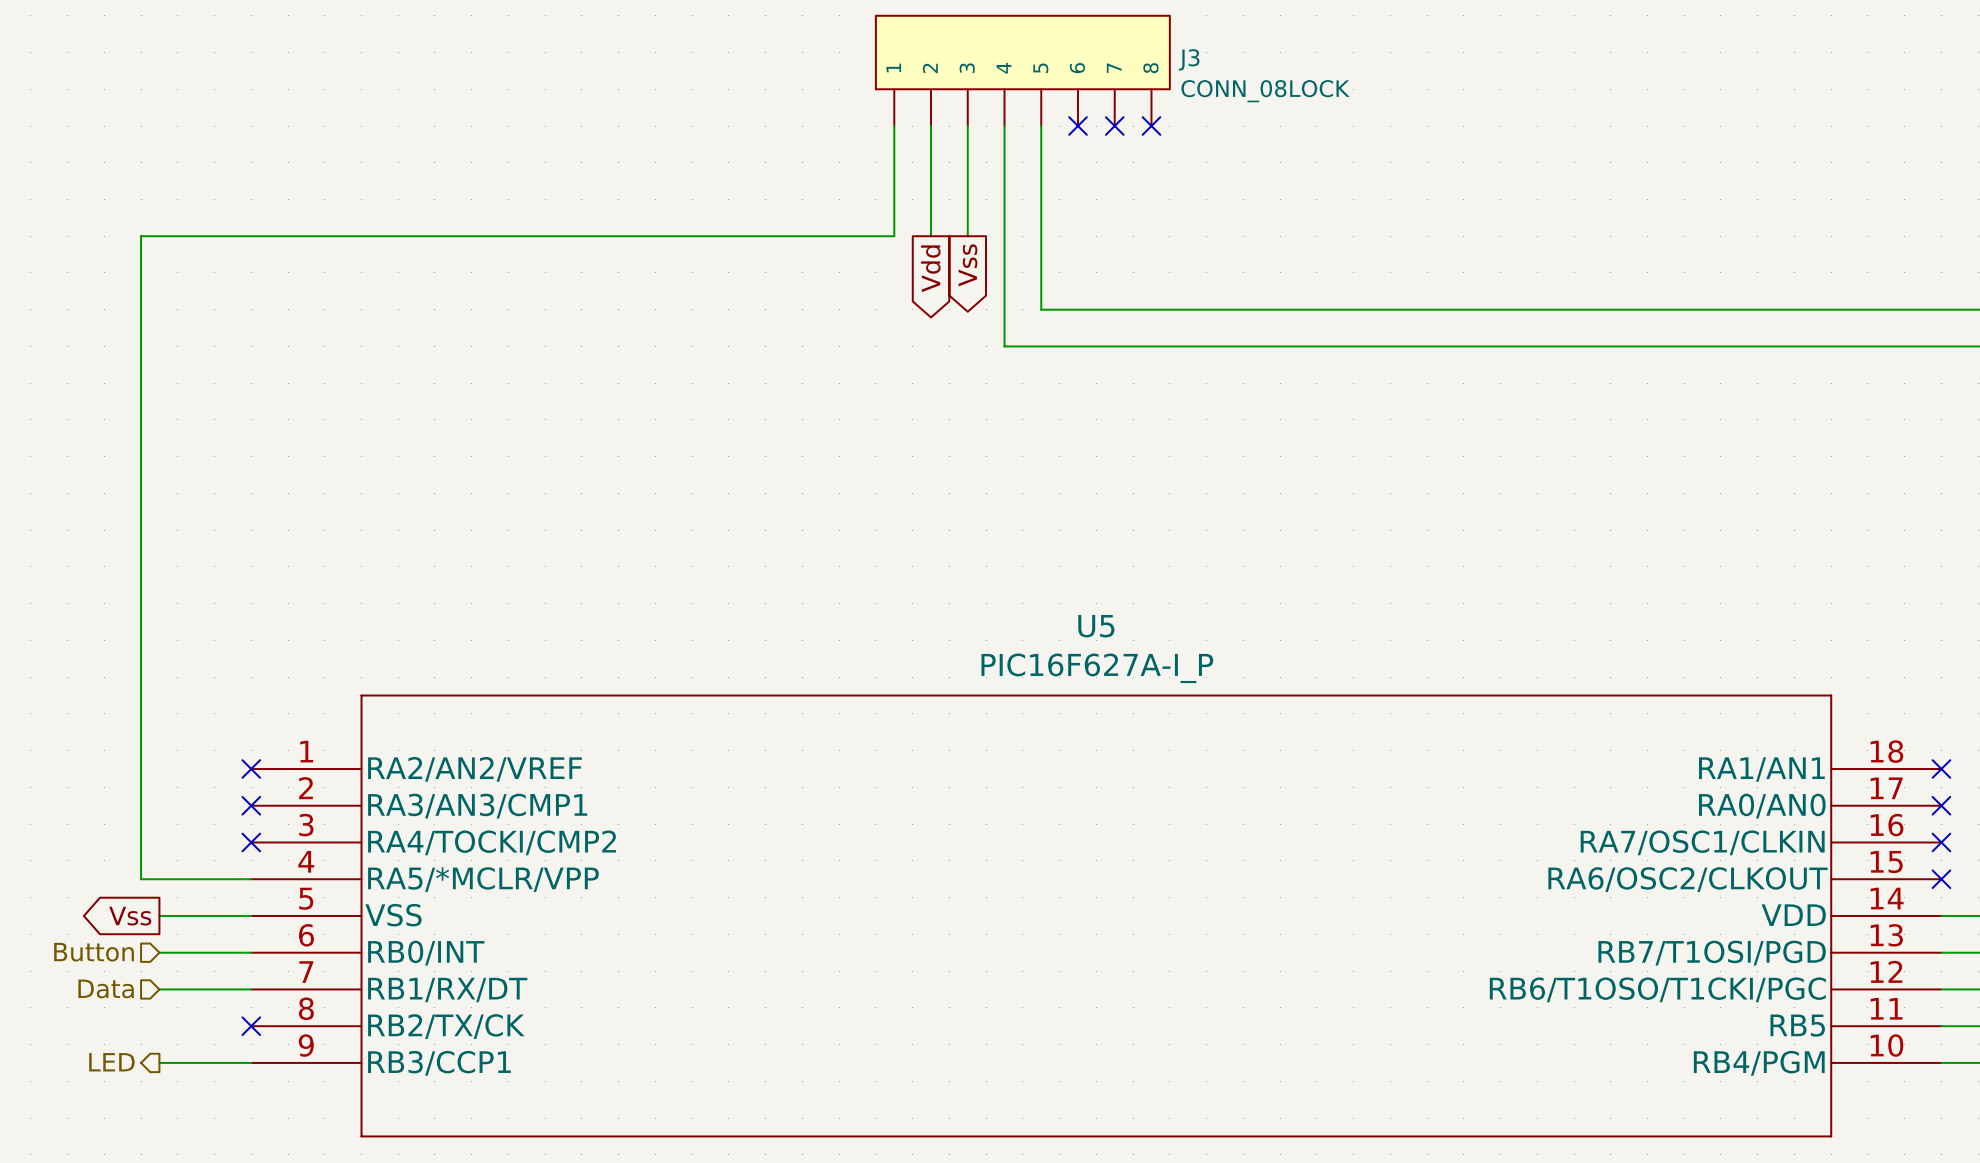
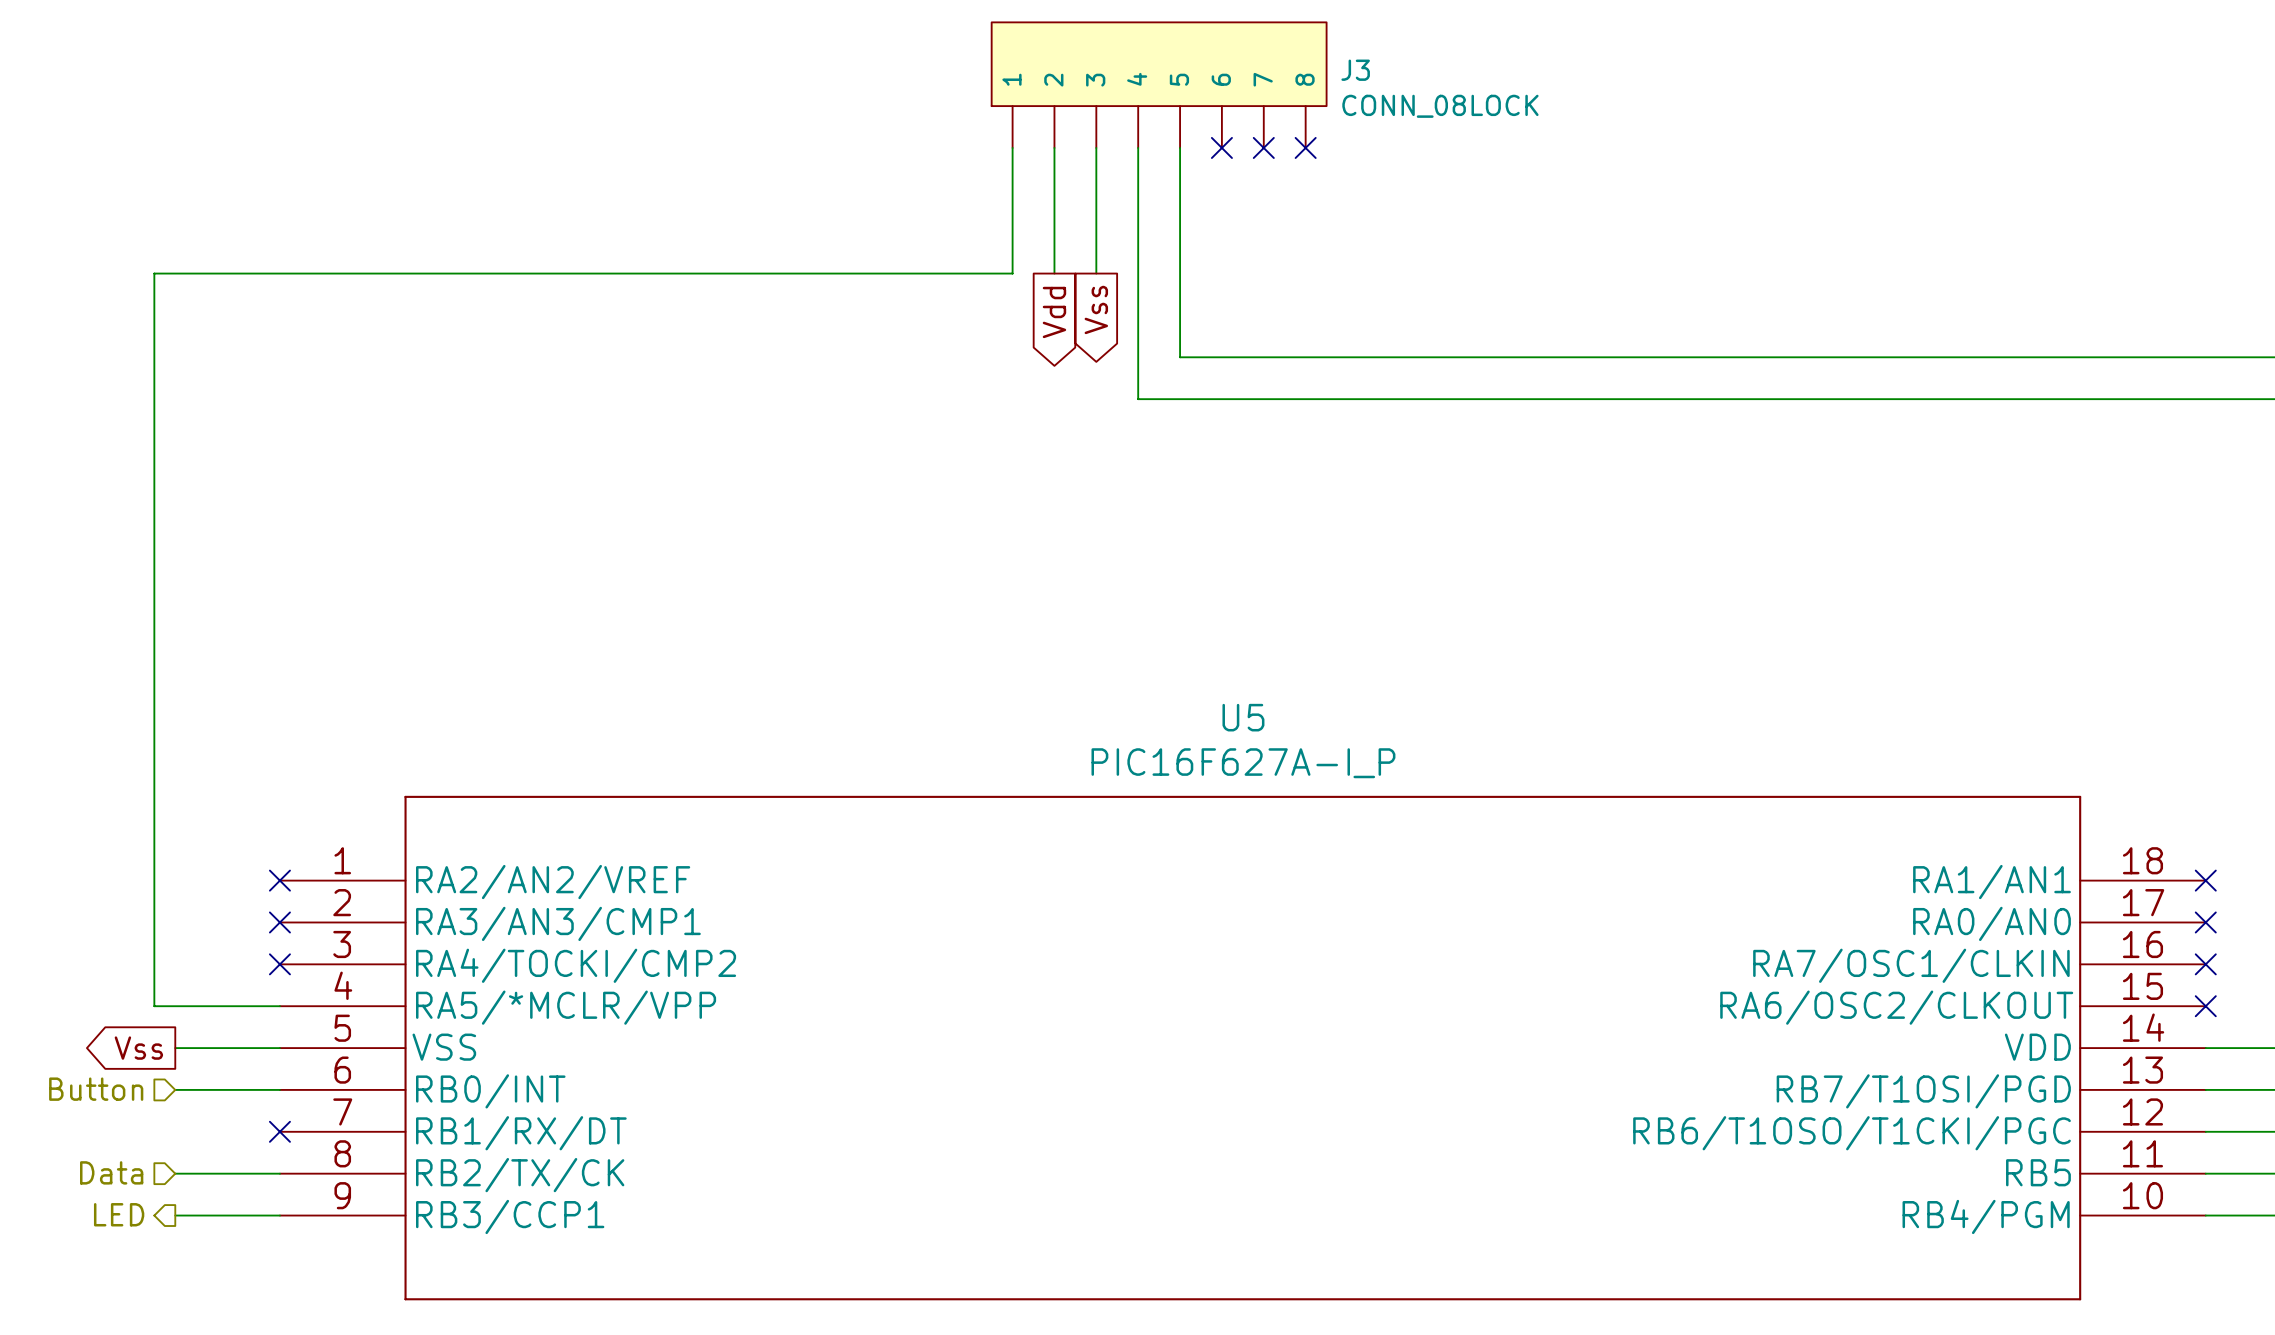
hierarchical label position: Data (106, 988) -> Data (111, 1172)
wire: (159, 989) (251, 989) -> (175, 1173) (279, 1173)
no-connect mark position: (251, 1026) -> (279, 1131)

